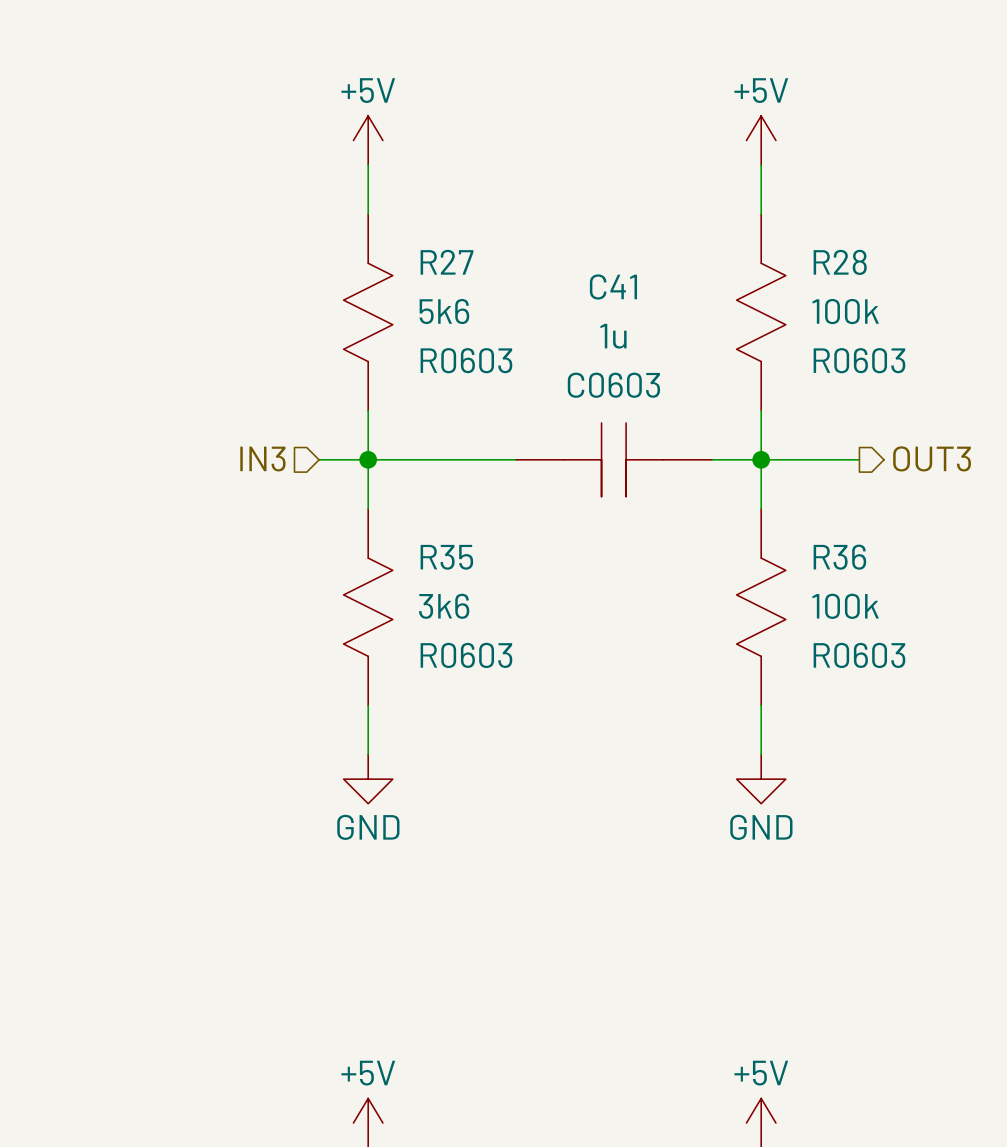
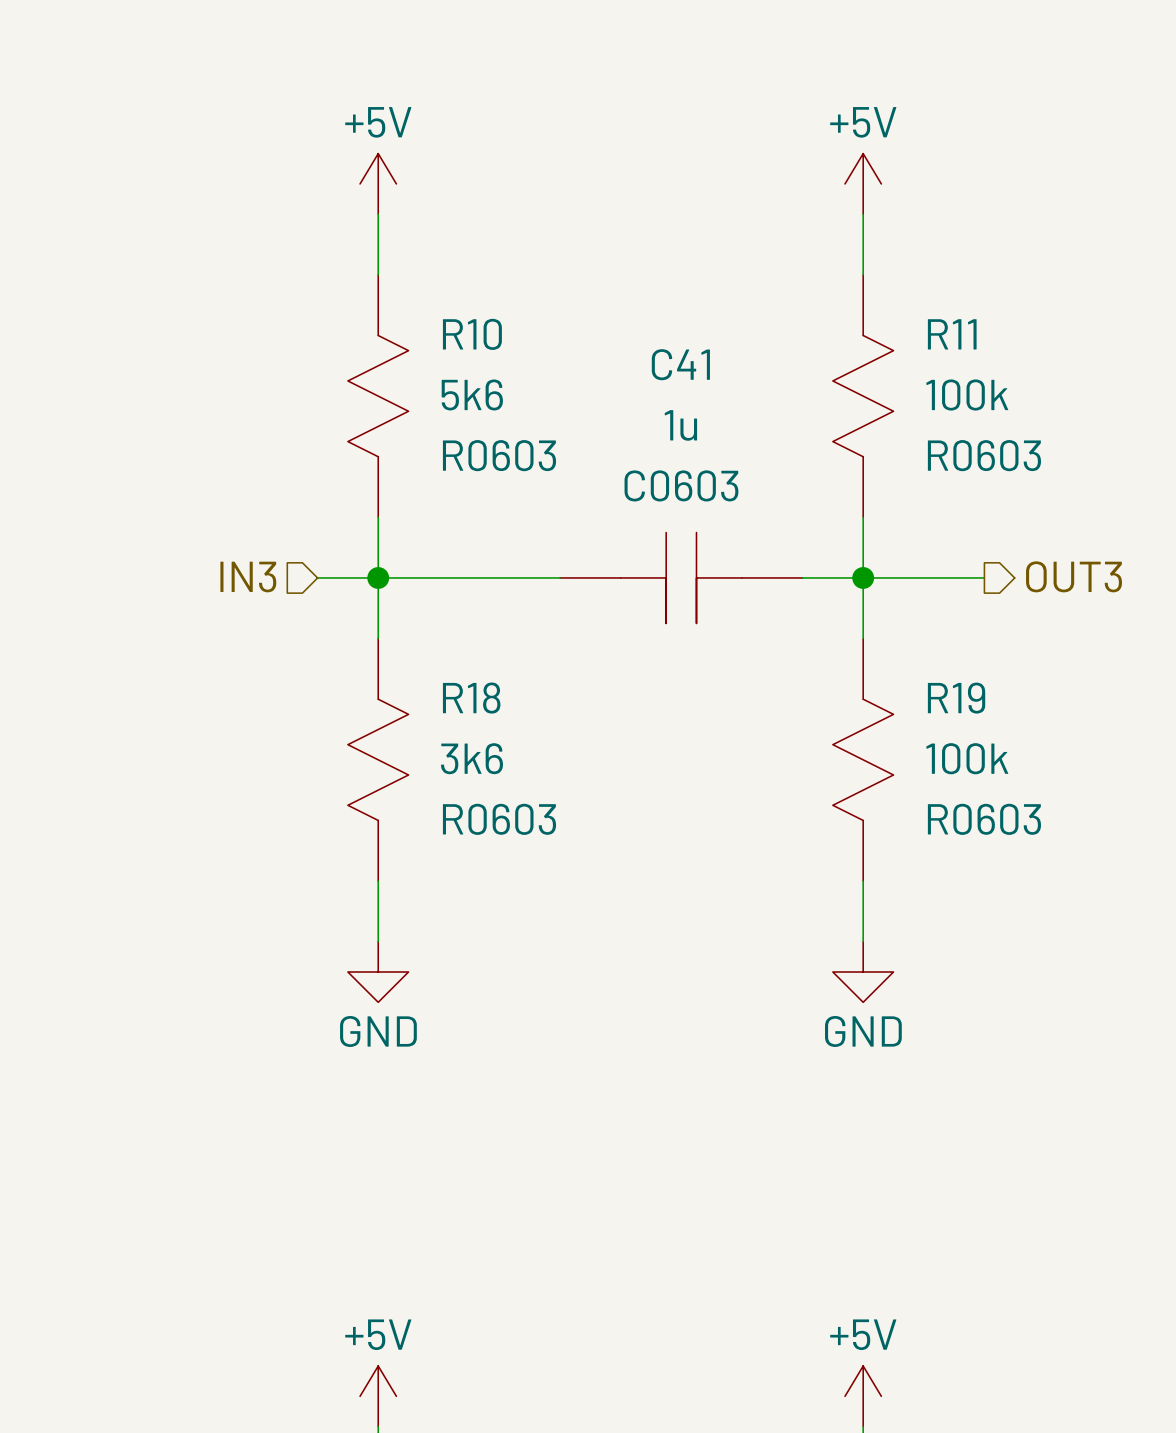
R27 name: R27 (447, 262) -> R10 (472, 334)
R28 name: R28 (840, 262) -> R11 (952, 334)
R35 name: R35 (446, 557) -> R18 (471, 698)
R36 name: R36 (839, 557) -> R19 (956, 698)

